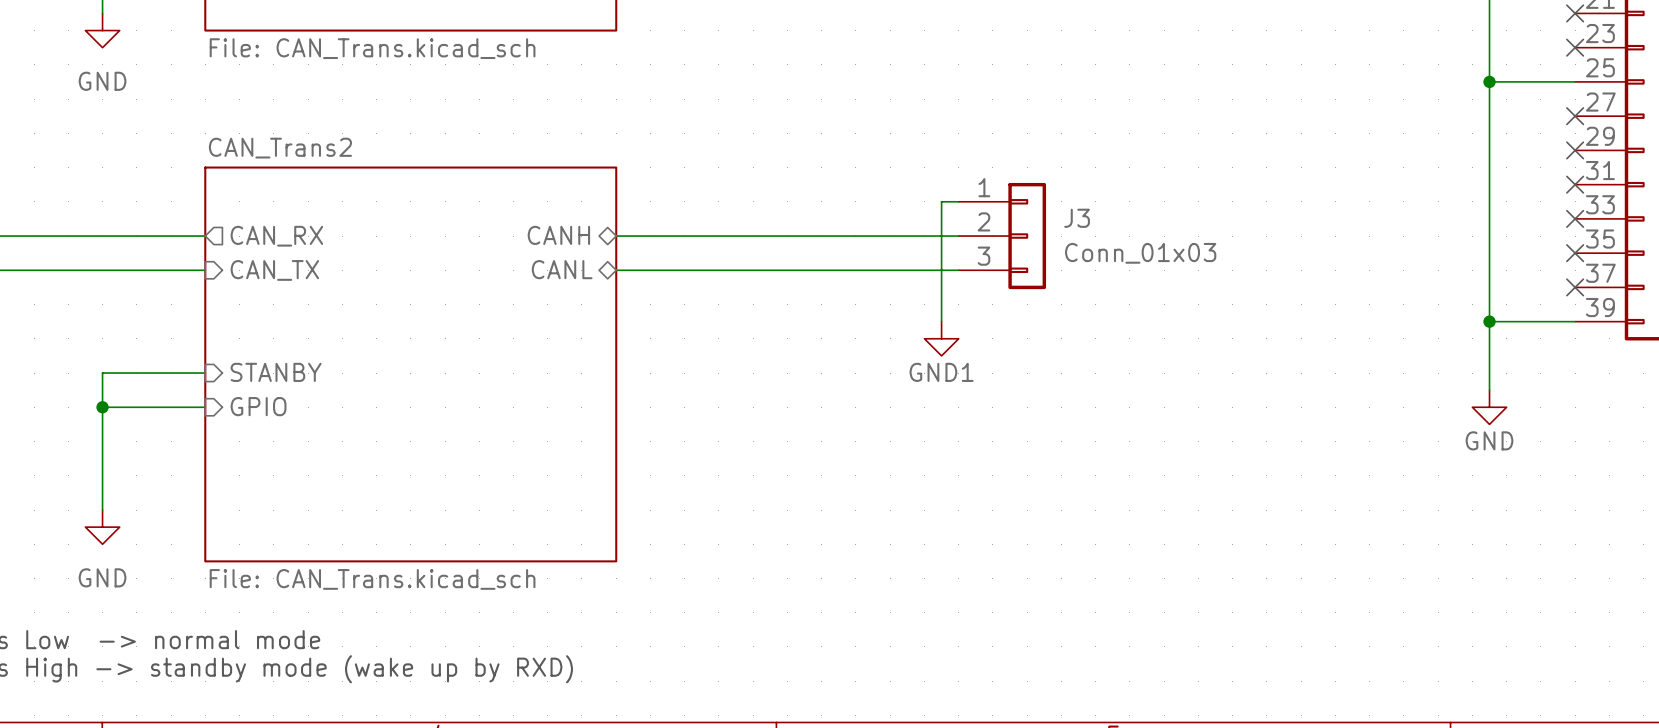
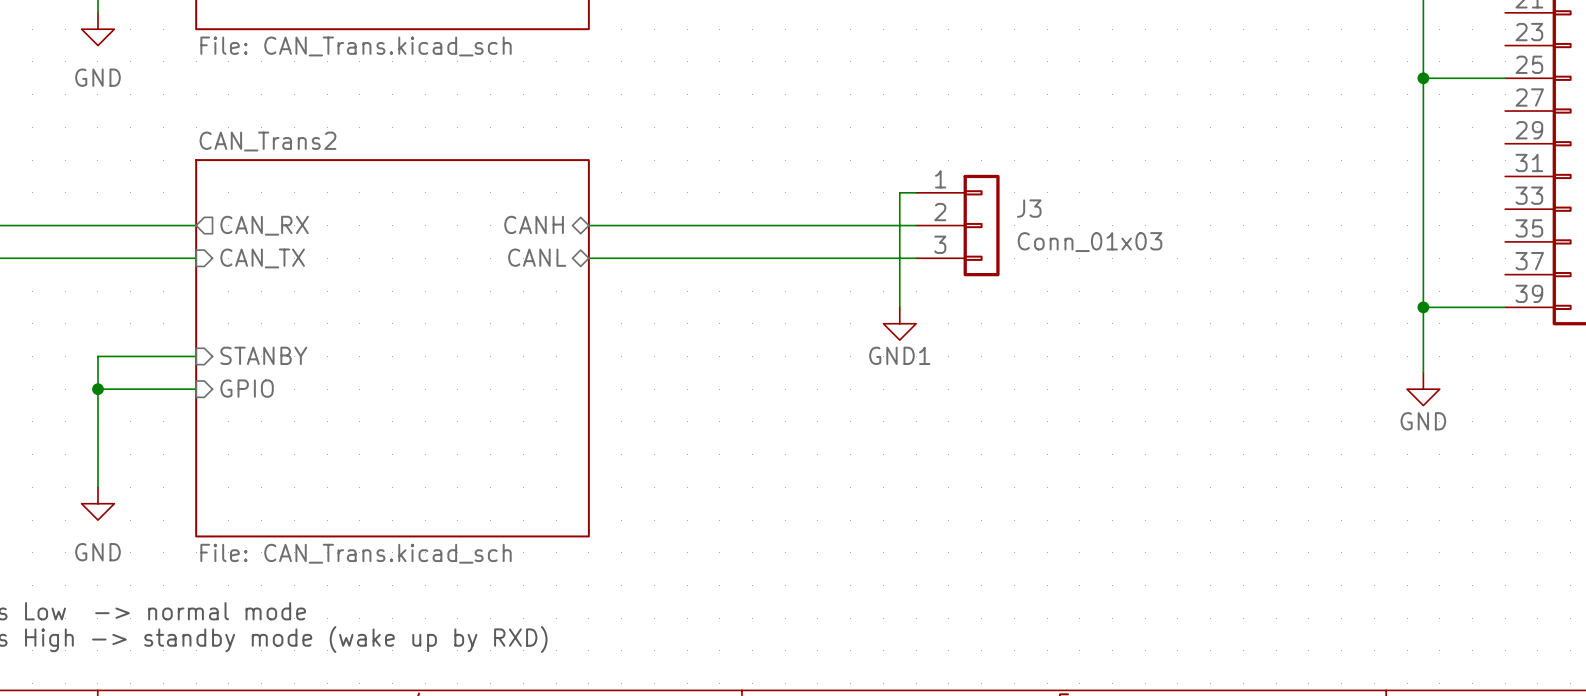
no-connect mark: (1575, 13) -> none
no-connect mark: (1575, 47) -> none
no-connect mark: (1575, 116) -> none
no-connect mark: (1575, 150) -> none
no-connect mark: (1575, 184) -> none
no-connect mark: (1575, 218) -> none
no-connect mark: (1575, 253) -> none
no-connect mark: (1575, 287) -> none

